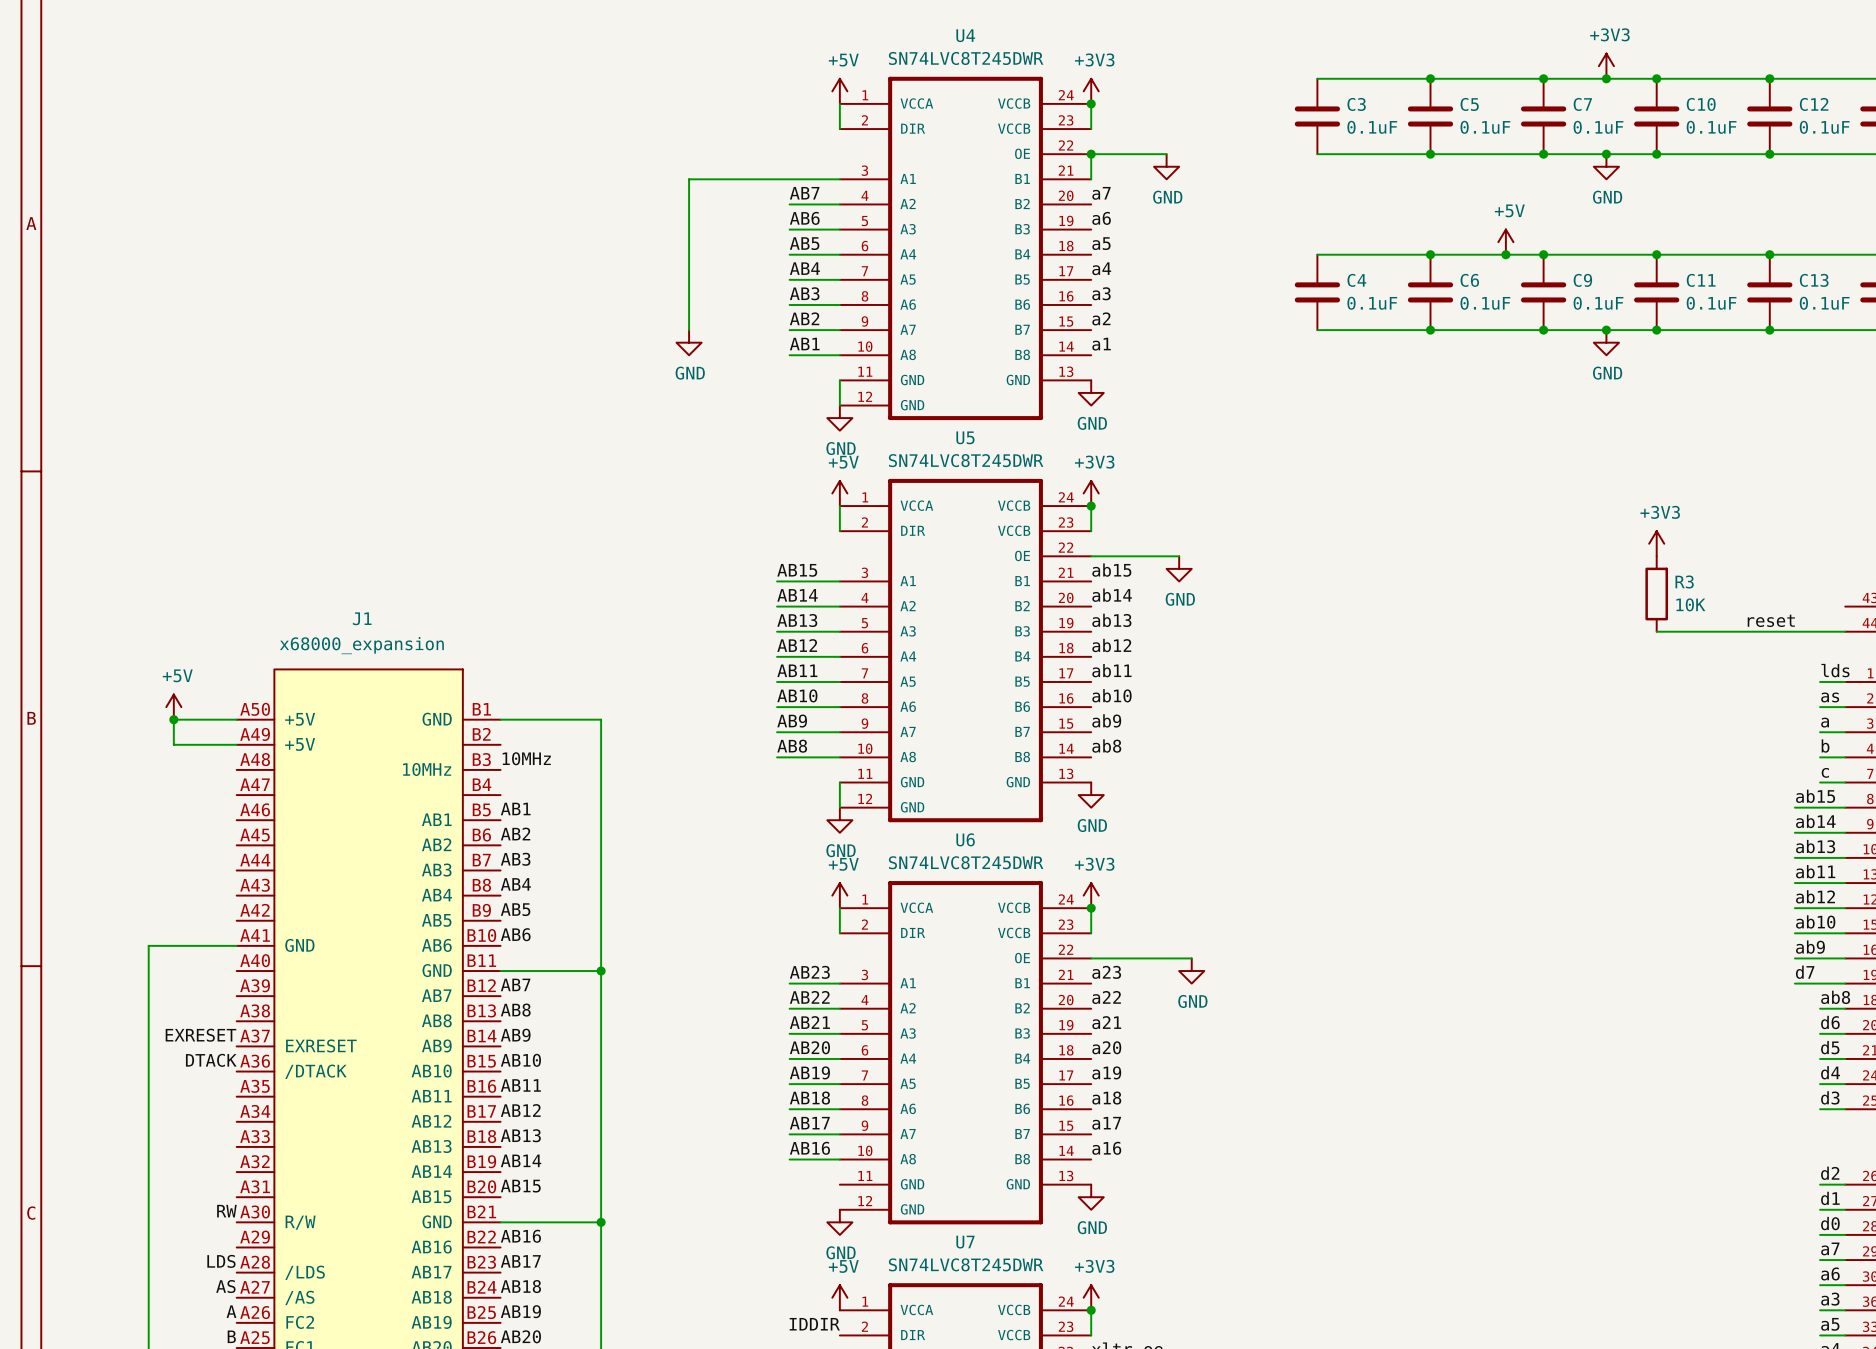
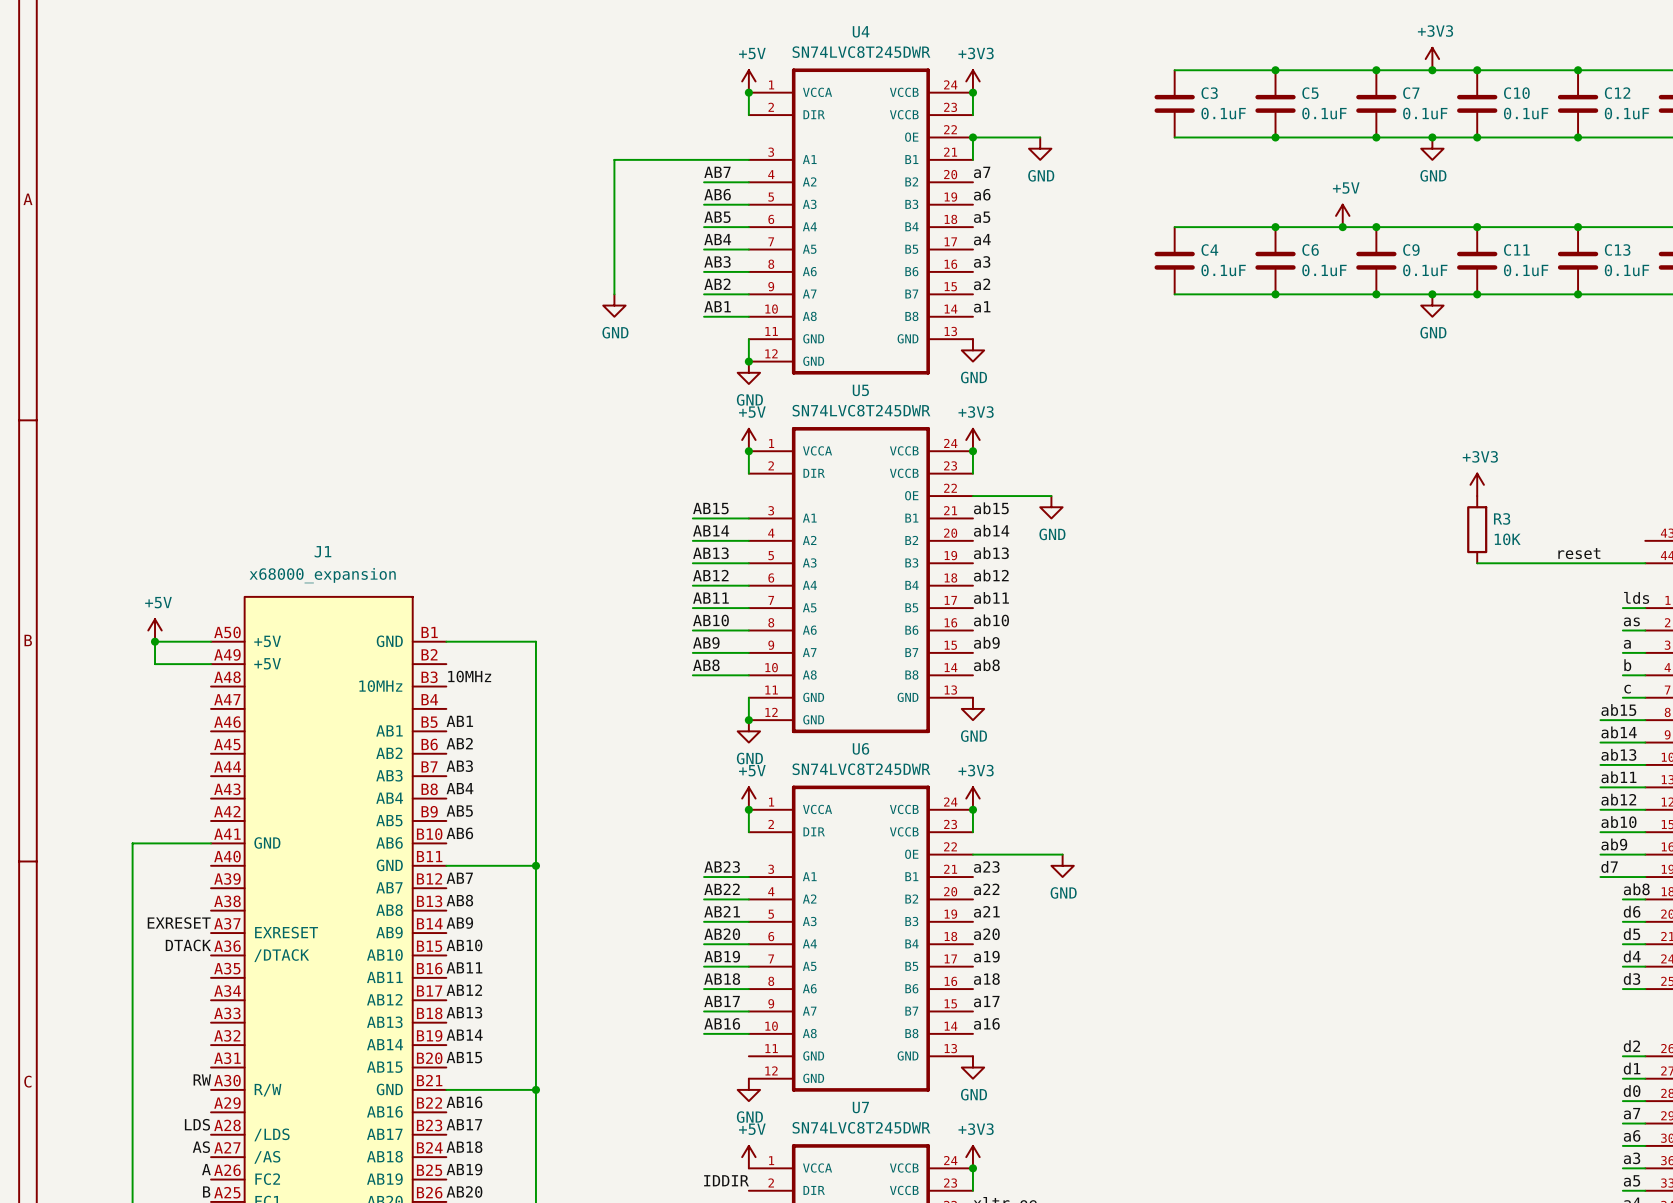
junction: none -> (748, 92)
junction: none -> (748, 361)
junction: none -> (748, 451)
junction: none -> (748, 720)
junction: none -> (748, 809)

